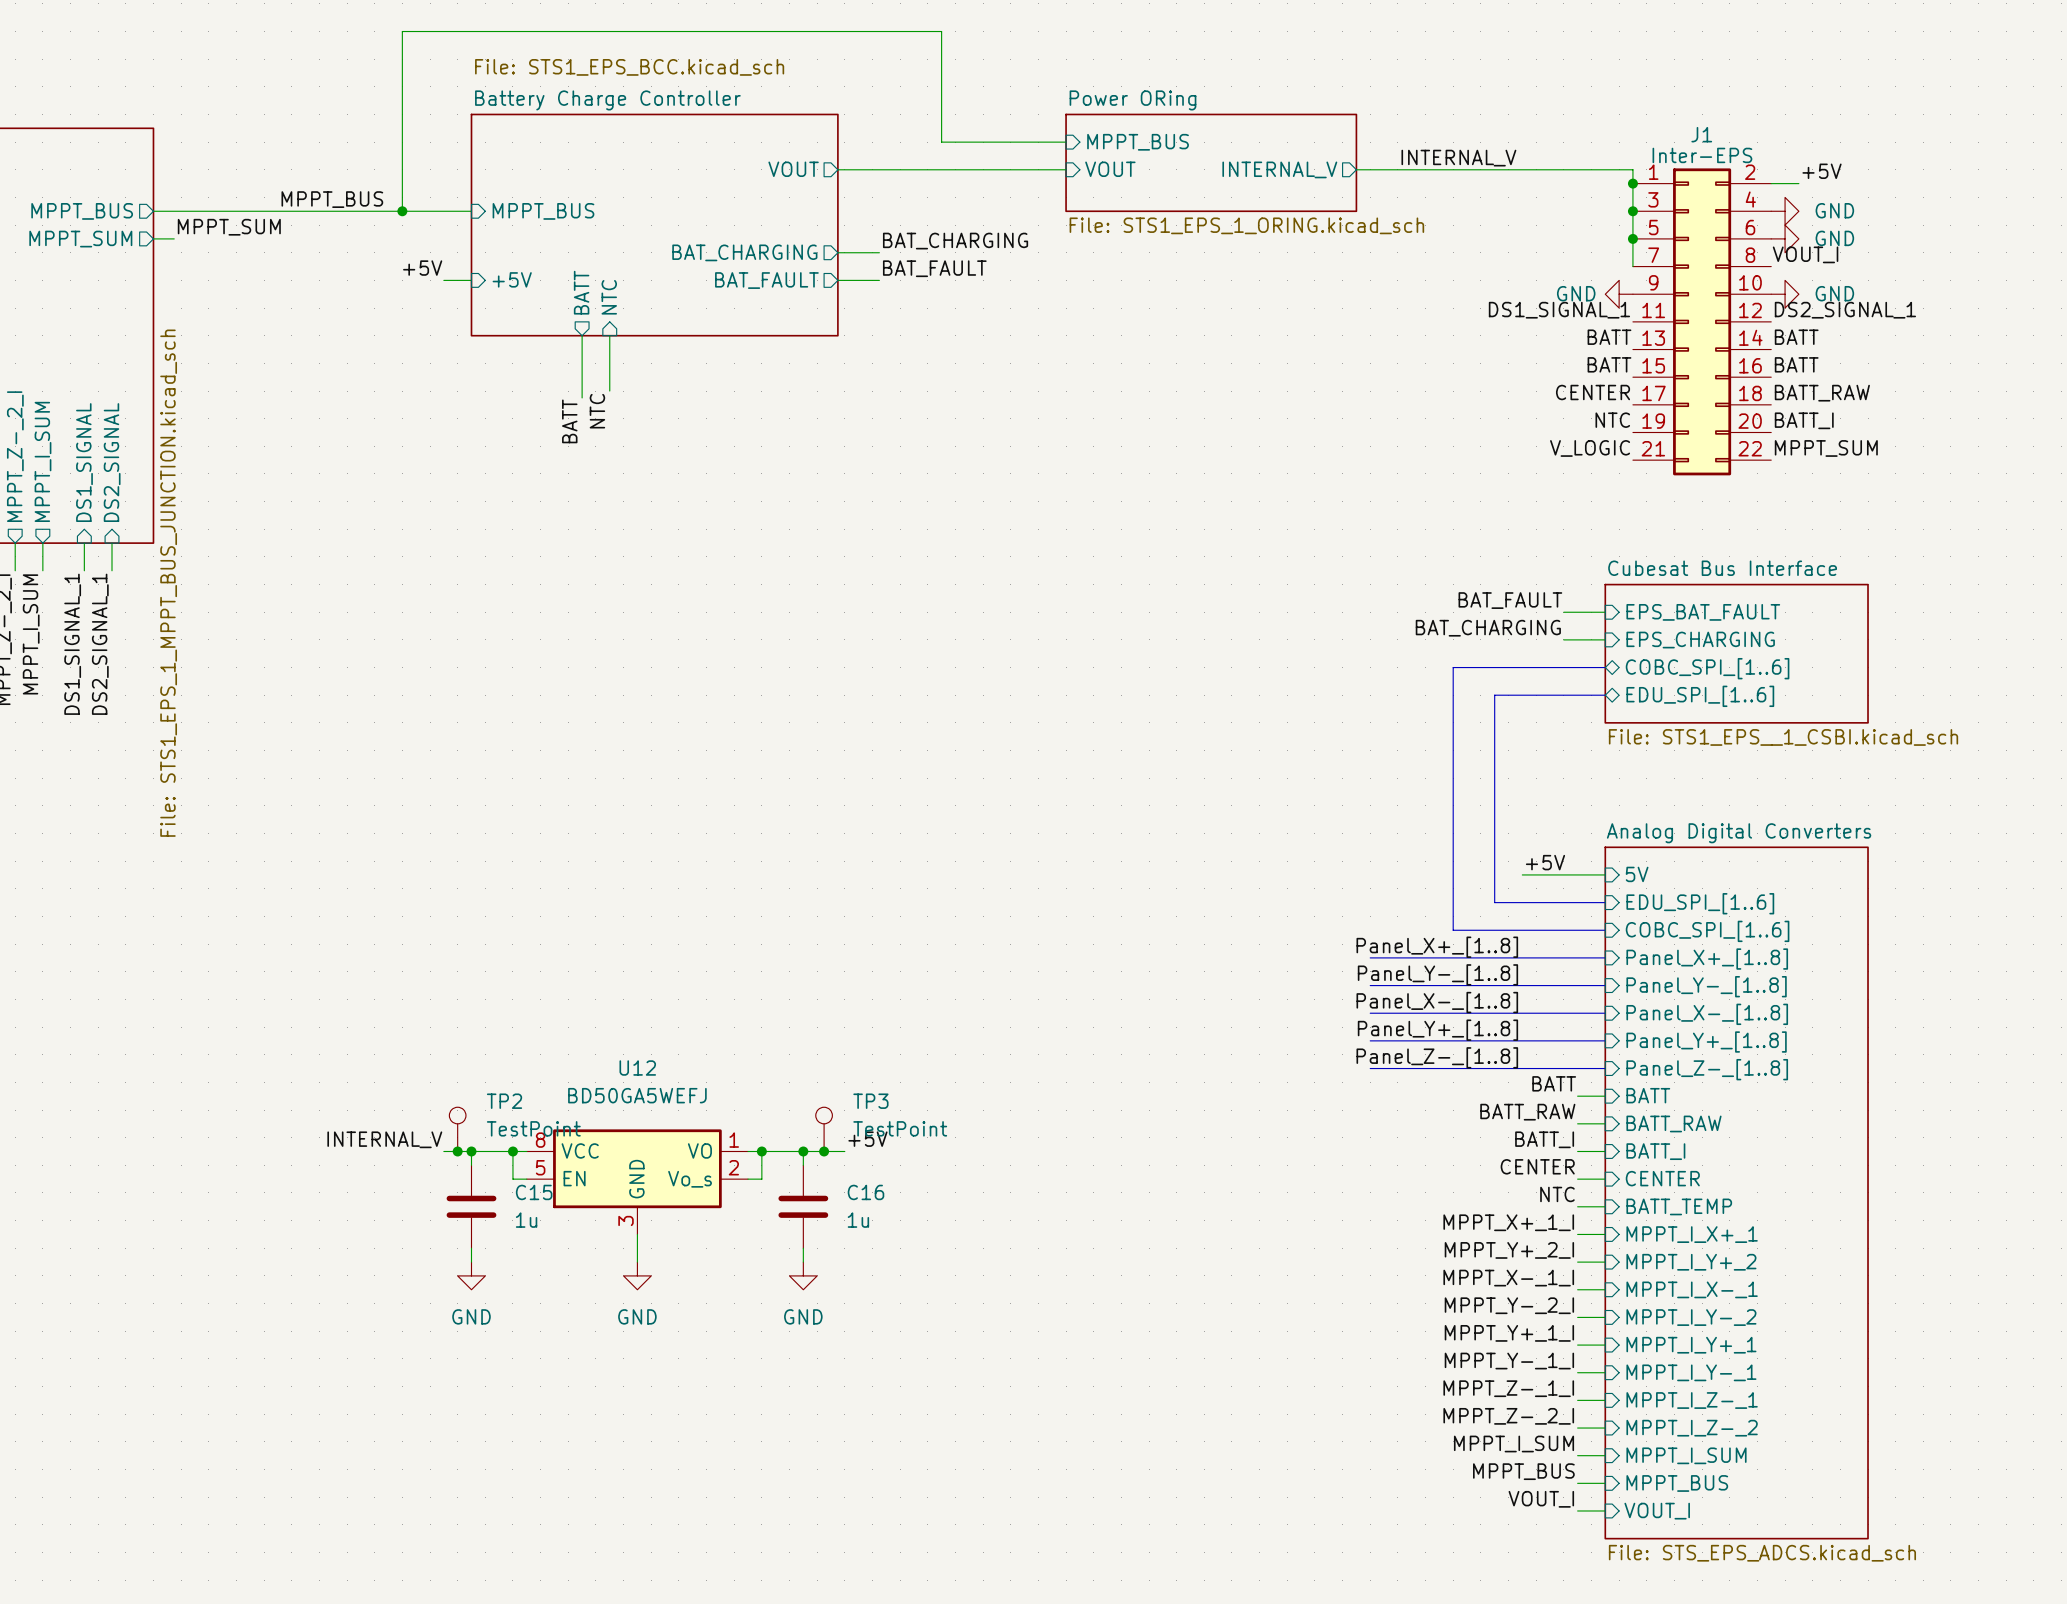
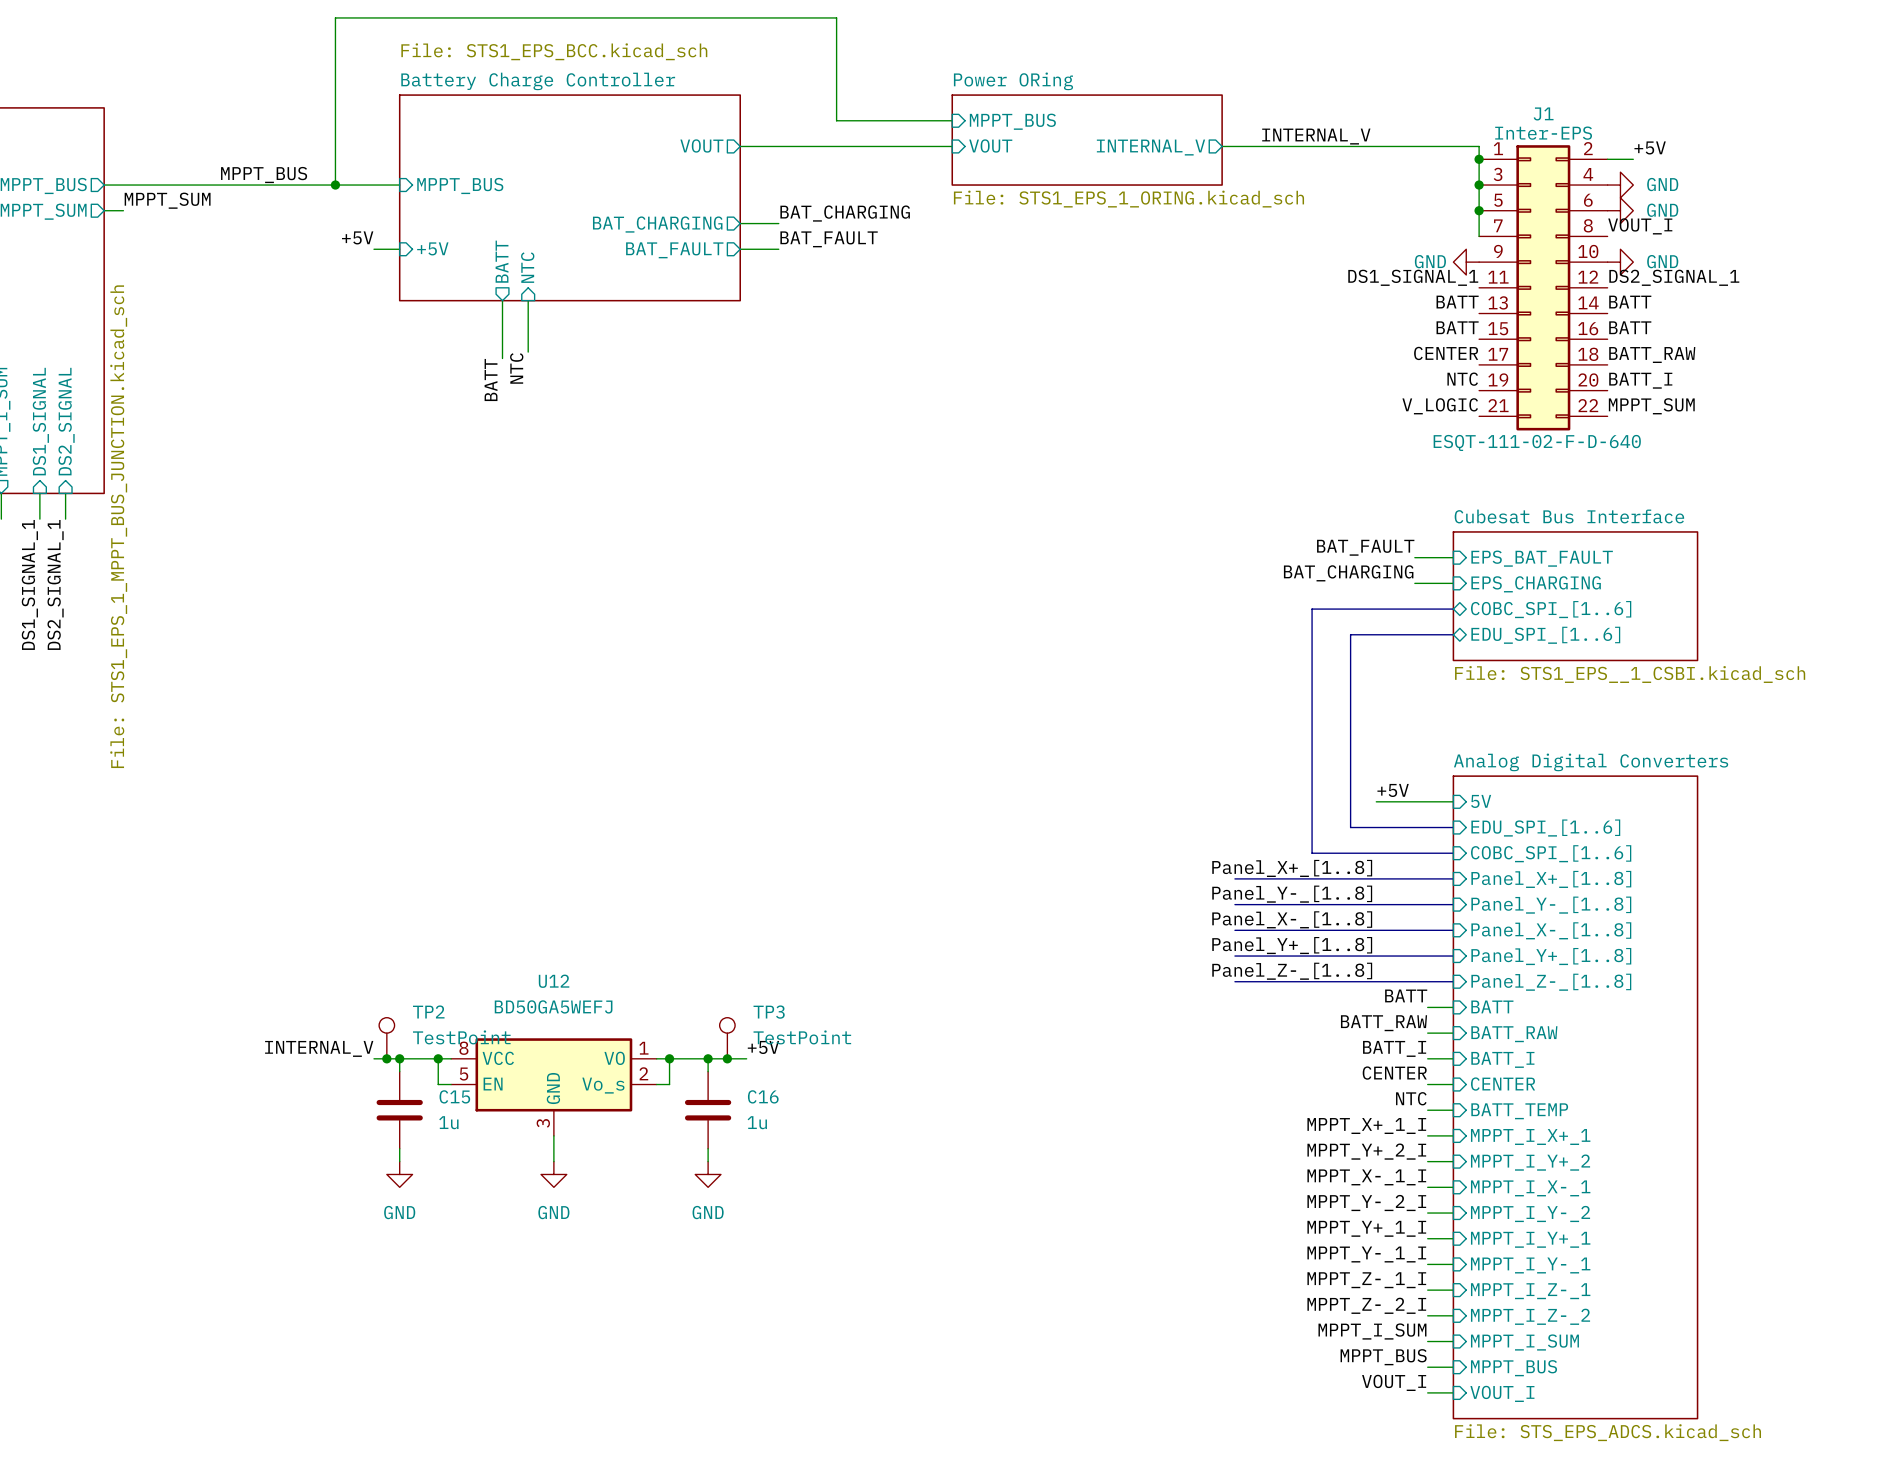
J1 text: none -> ESQT-111-02-F-D-640 (1537, 442)

